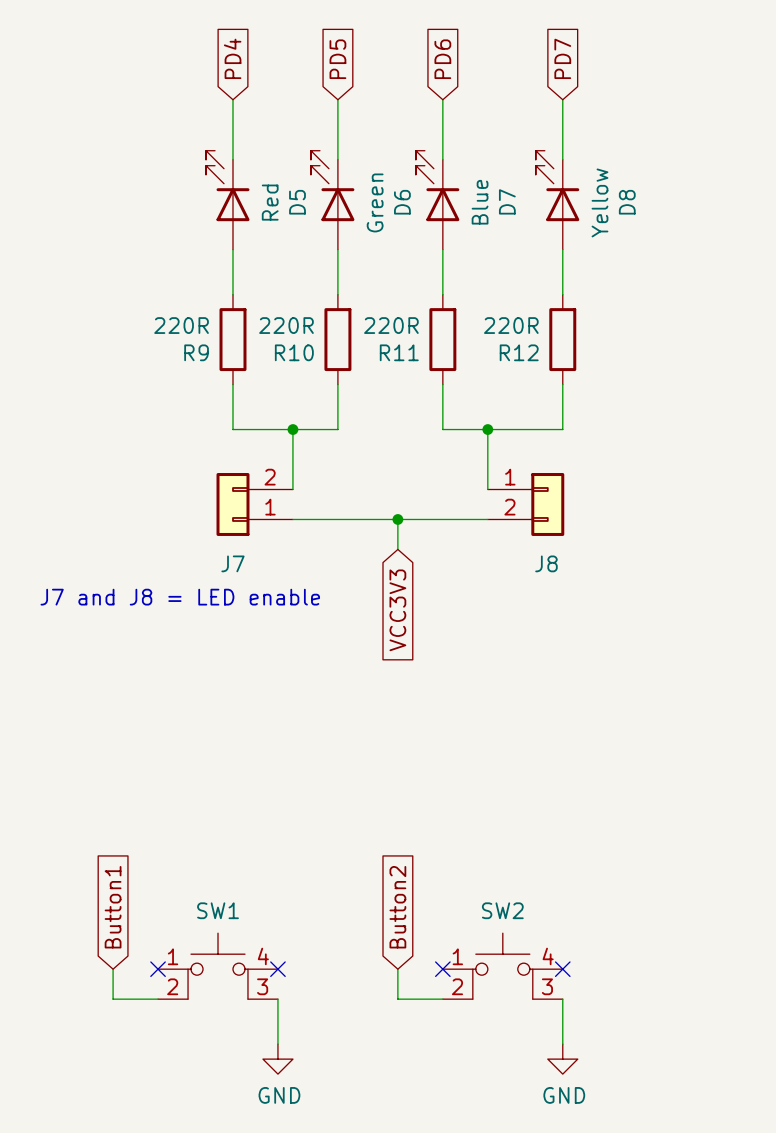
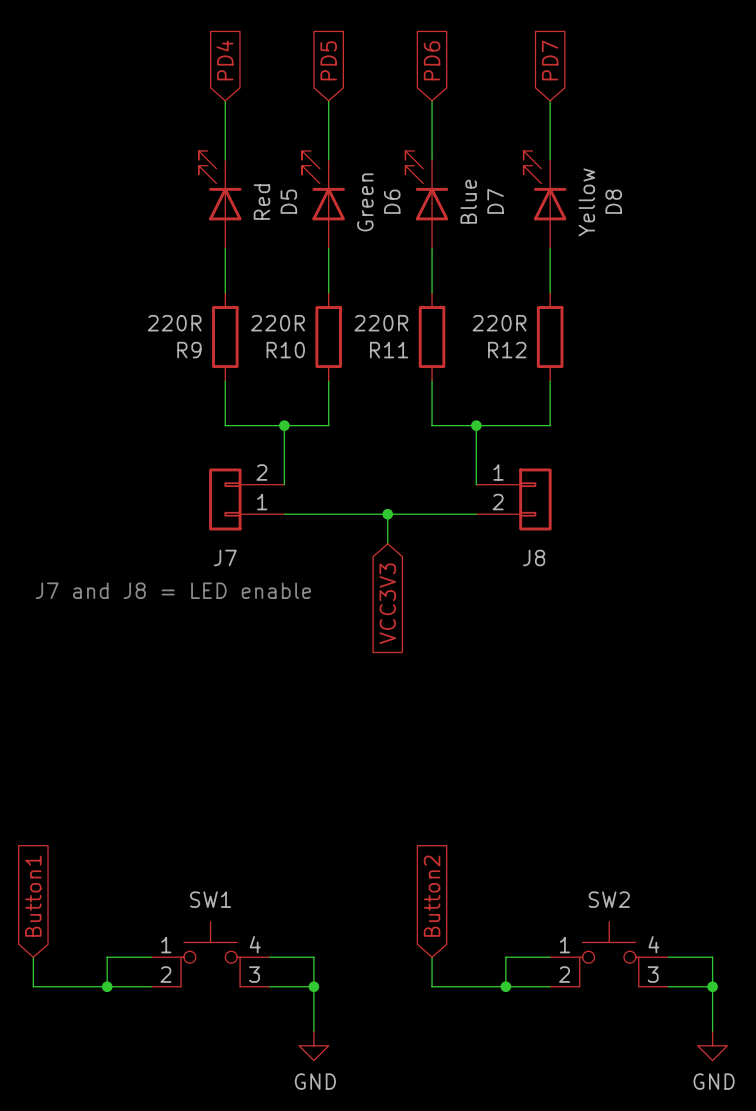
global label position: Button1 (113, 907) -> Button1 (33, 896)
global label position: Button2 (397, 907) -> Button2 (432, 896)
SW2 position: (502, 966) -> (609, 954)
wire: none -> (33, 957) (33, 986) (107, 986)
wire: none -> (107, 957) (151, 957)
no-connect mark: (158, 969) -> none
wire: none -> (269, 957) (313, 957) (313, 1031)
no-connect mark: (277, 969) -> none
wire: (397, 969) (397, 999) (442, 999) -> none
no-connect mark: (442, 969) -> none
wire: none -> (550, 957) (505, 957) (505, 986)
no-connect mark: (562, 969) -> none
wire: none -> (668, 957) (712, 957) (712, 1031)
junction: none -> (107, 986)
wire: (277, 999) (277, 1044) -> (269, 986) (313, 986)
junction: none -> (313, 986)
junction: none -> (505, 986)
wire: (562, 999) (562, 1044) -> (550, 986) (432, 986) (432, 957)
wire: none -> (668, 986) (712, 986)
junction: none -> (712, 986)
power symbol position: GND (277, 1059) -> GND (313, 1045)
power symbol: GND (562, 1059) -> none
power symbol: none -> GND (712, 1045)

